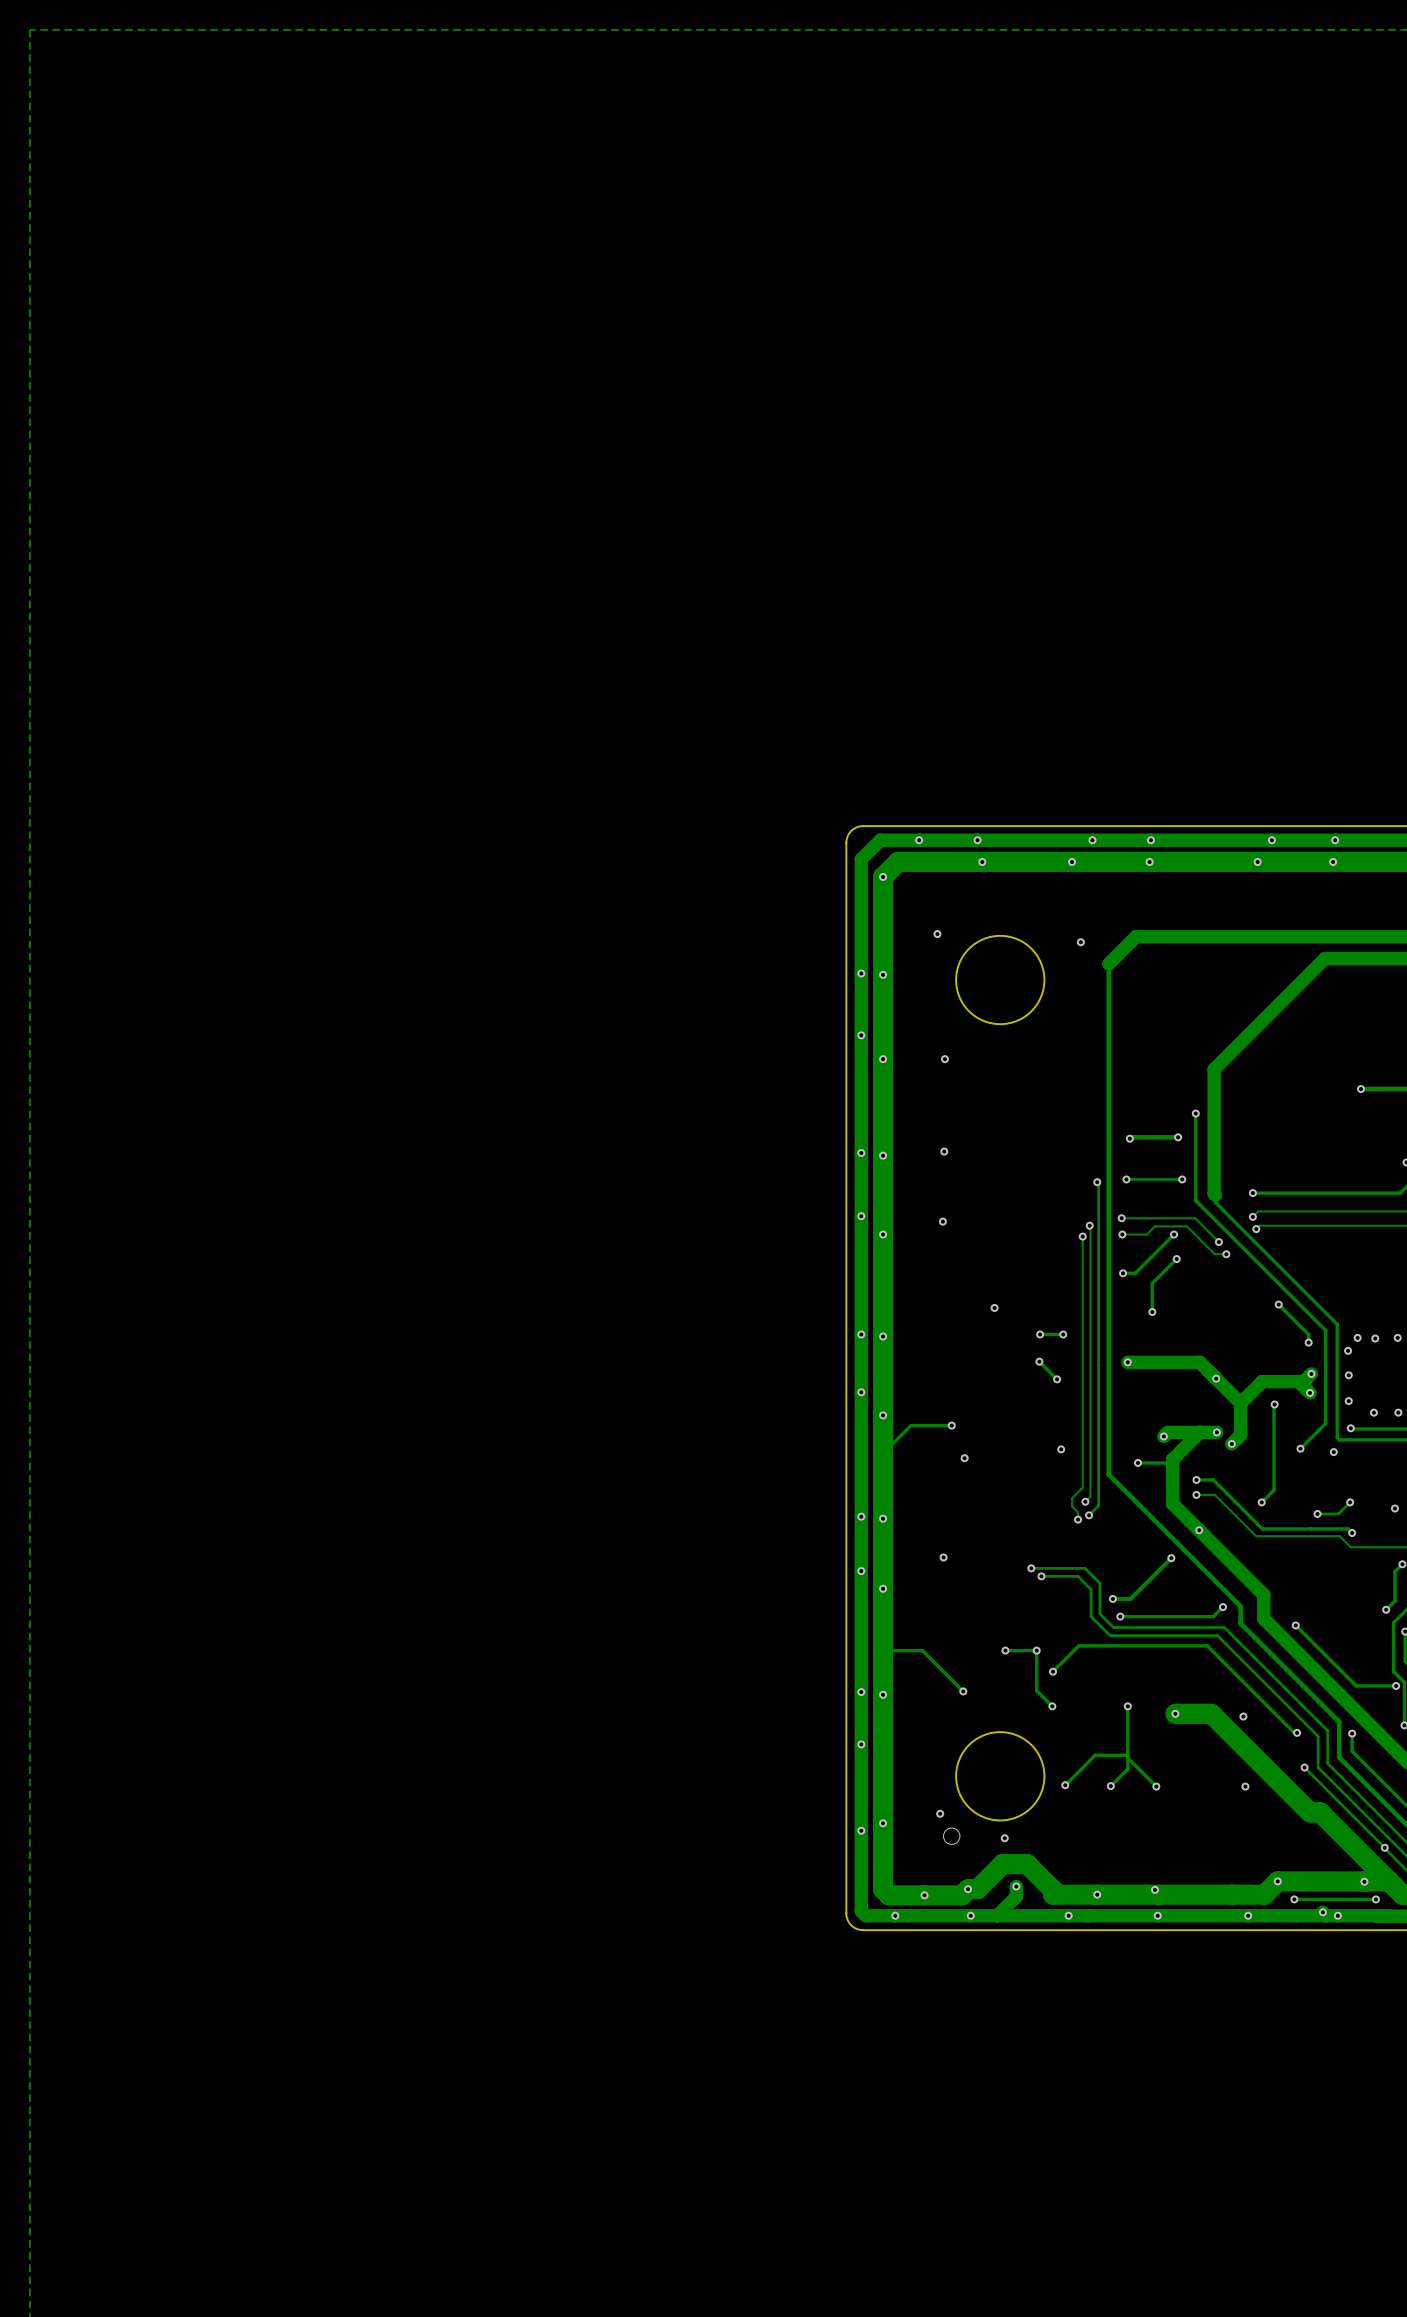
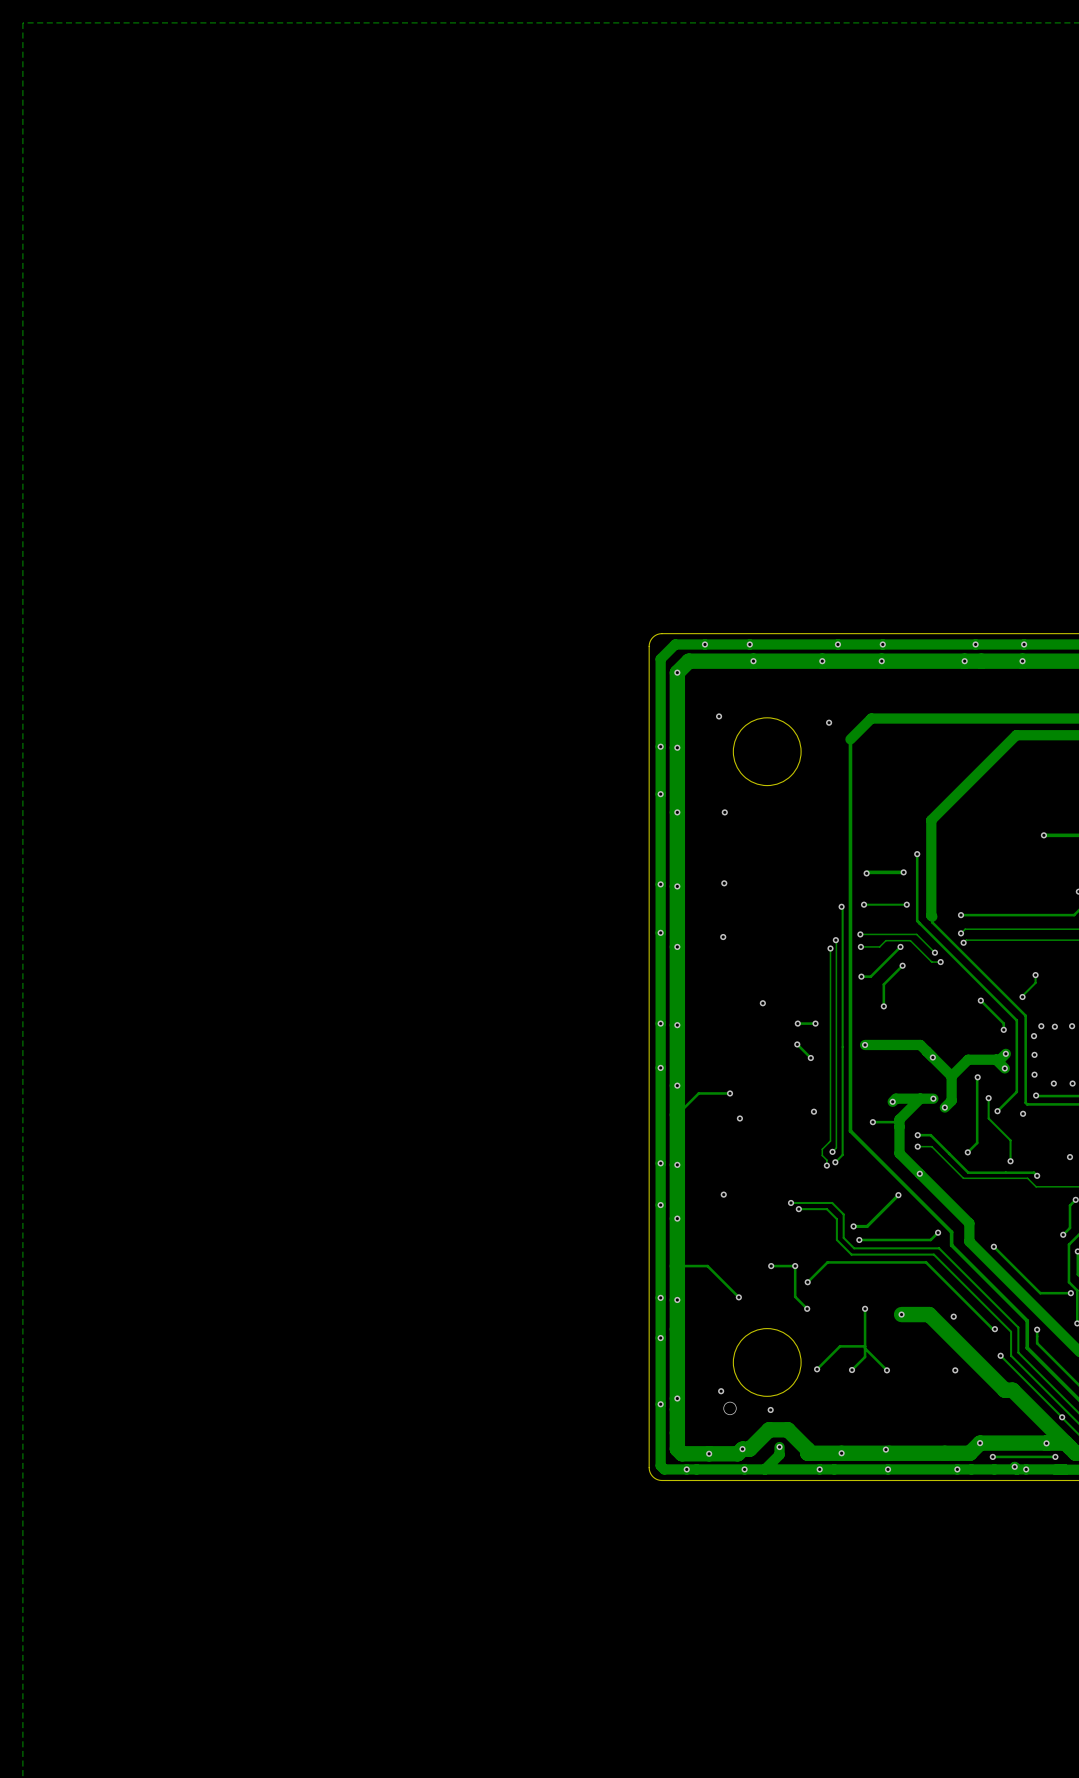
track: none -> (1035, 975) (1035, 982) (1022, 996)
via: none -> (1035, 975)
via: none -> (1022, 996)
via: none -> (988, 1098)
track: (1350, 1502) (1338, 1513) (1317, 1513) -> (988, 1098) (988, 1118) (1010, 1140) (1010, 1161)
via: (1350, 1502) -> none

